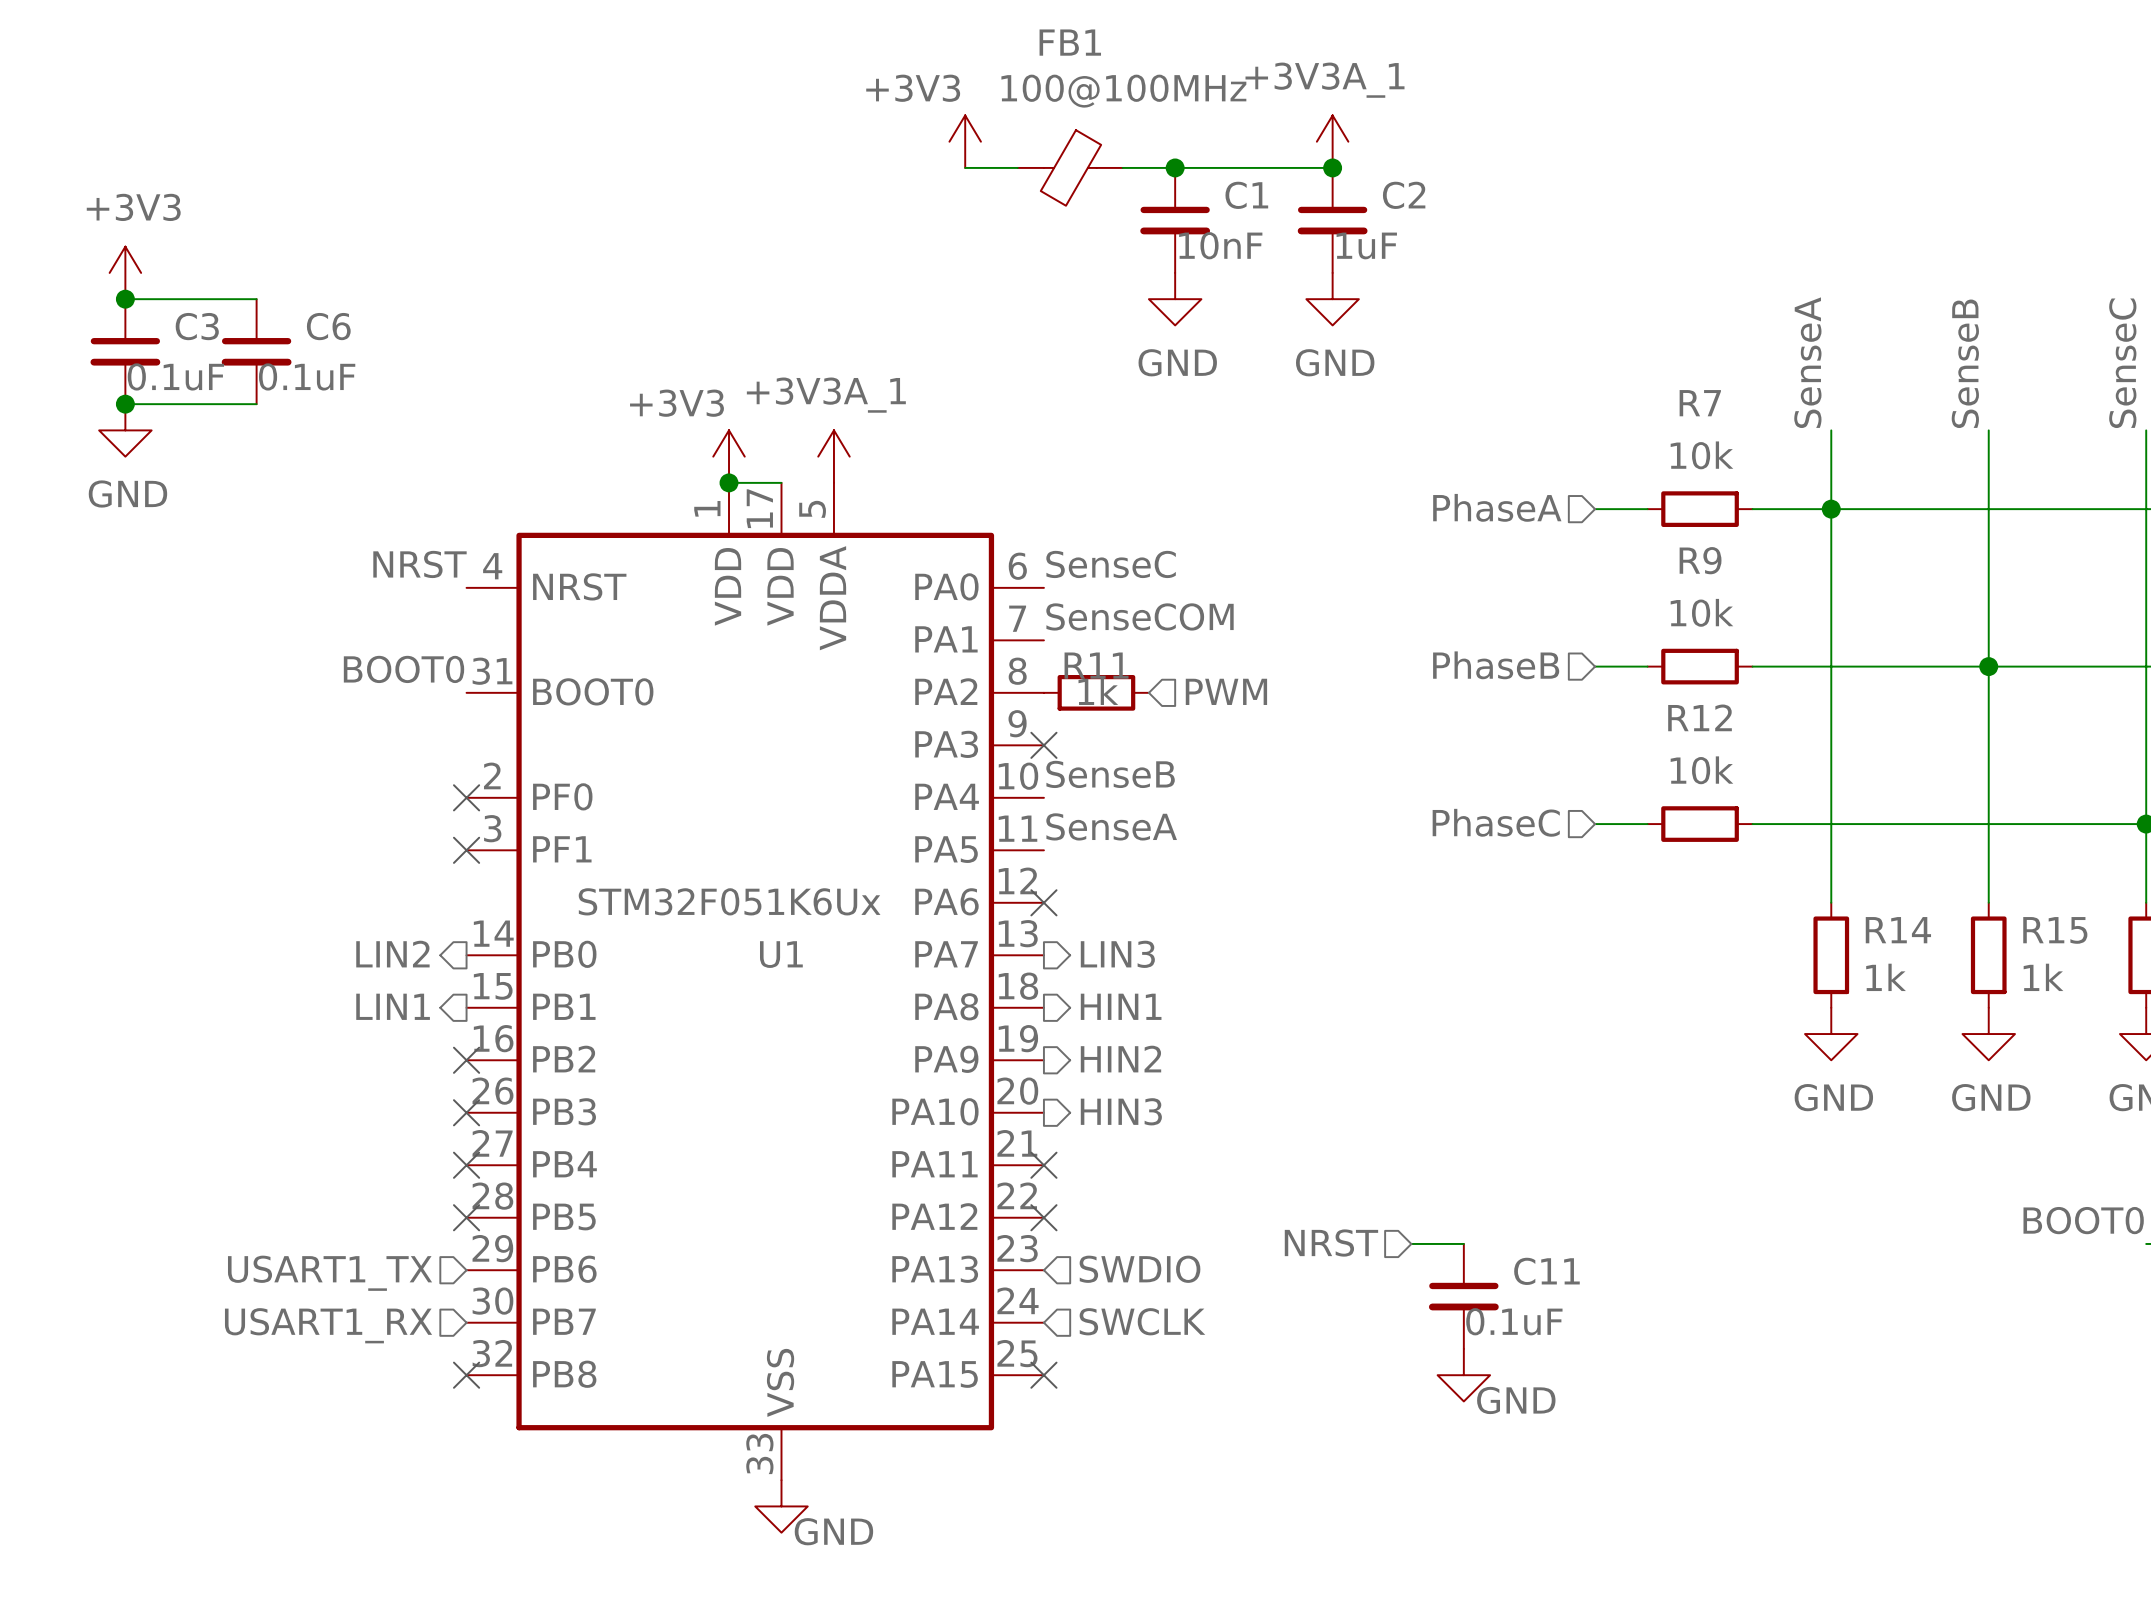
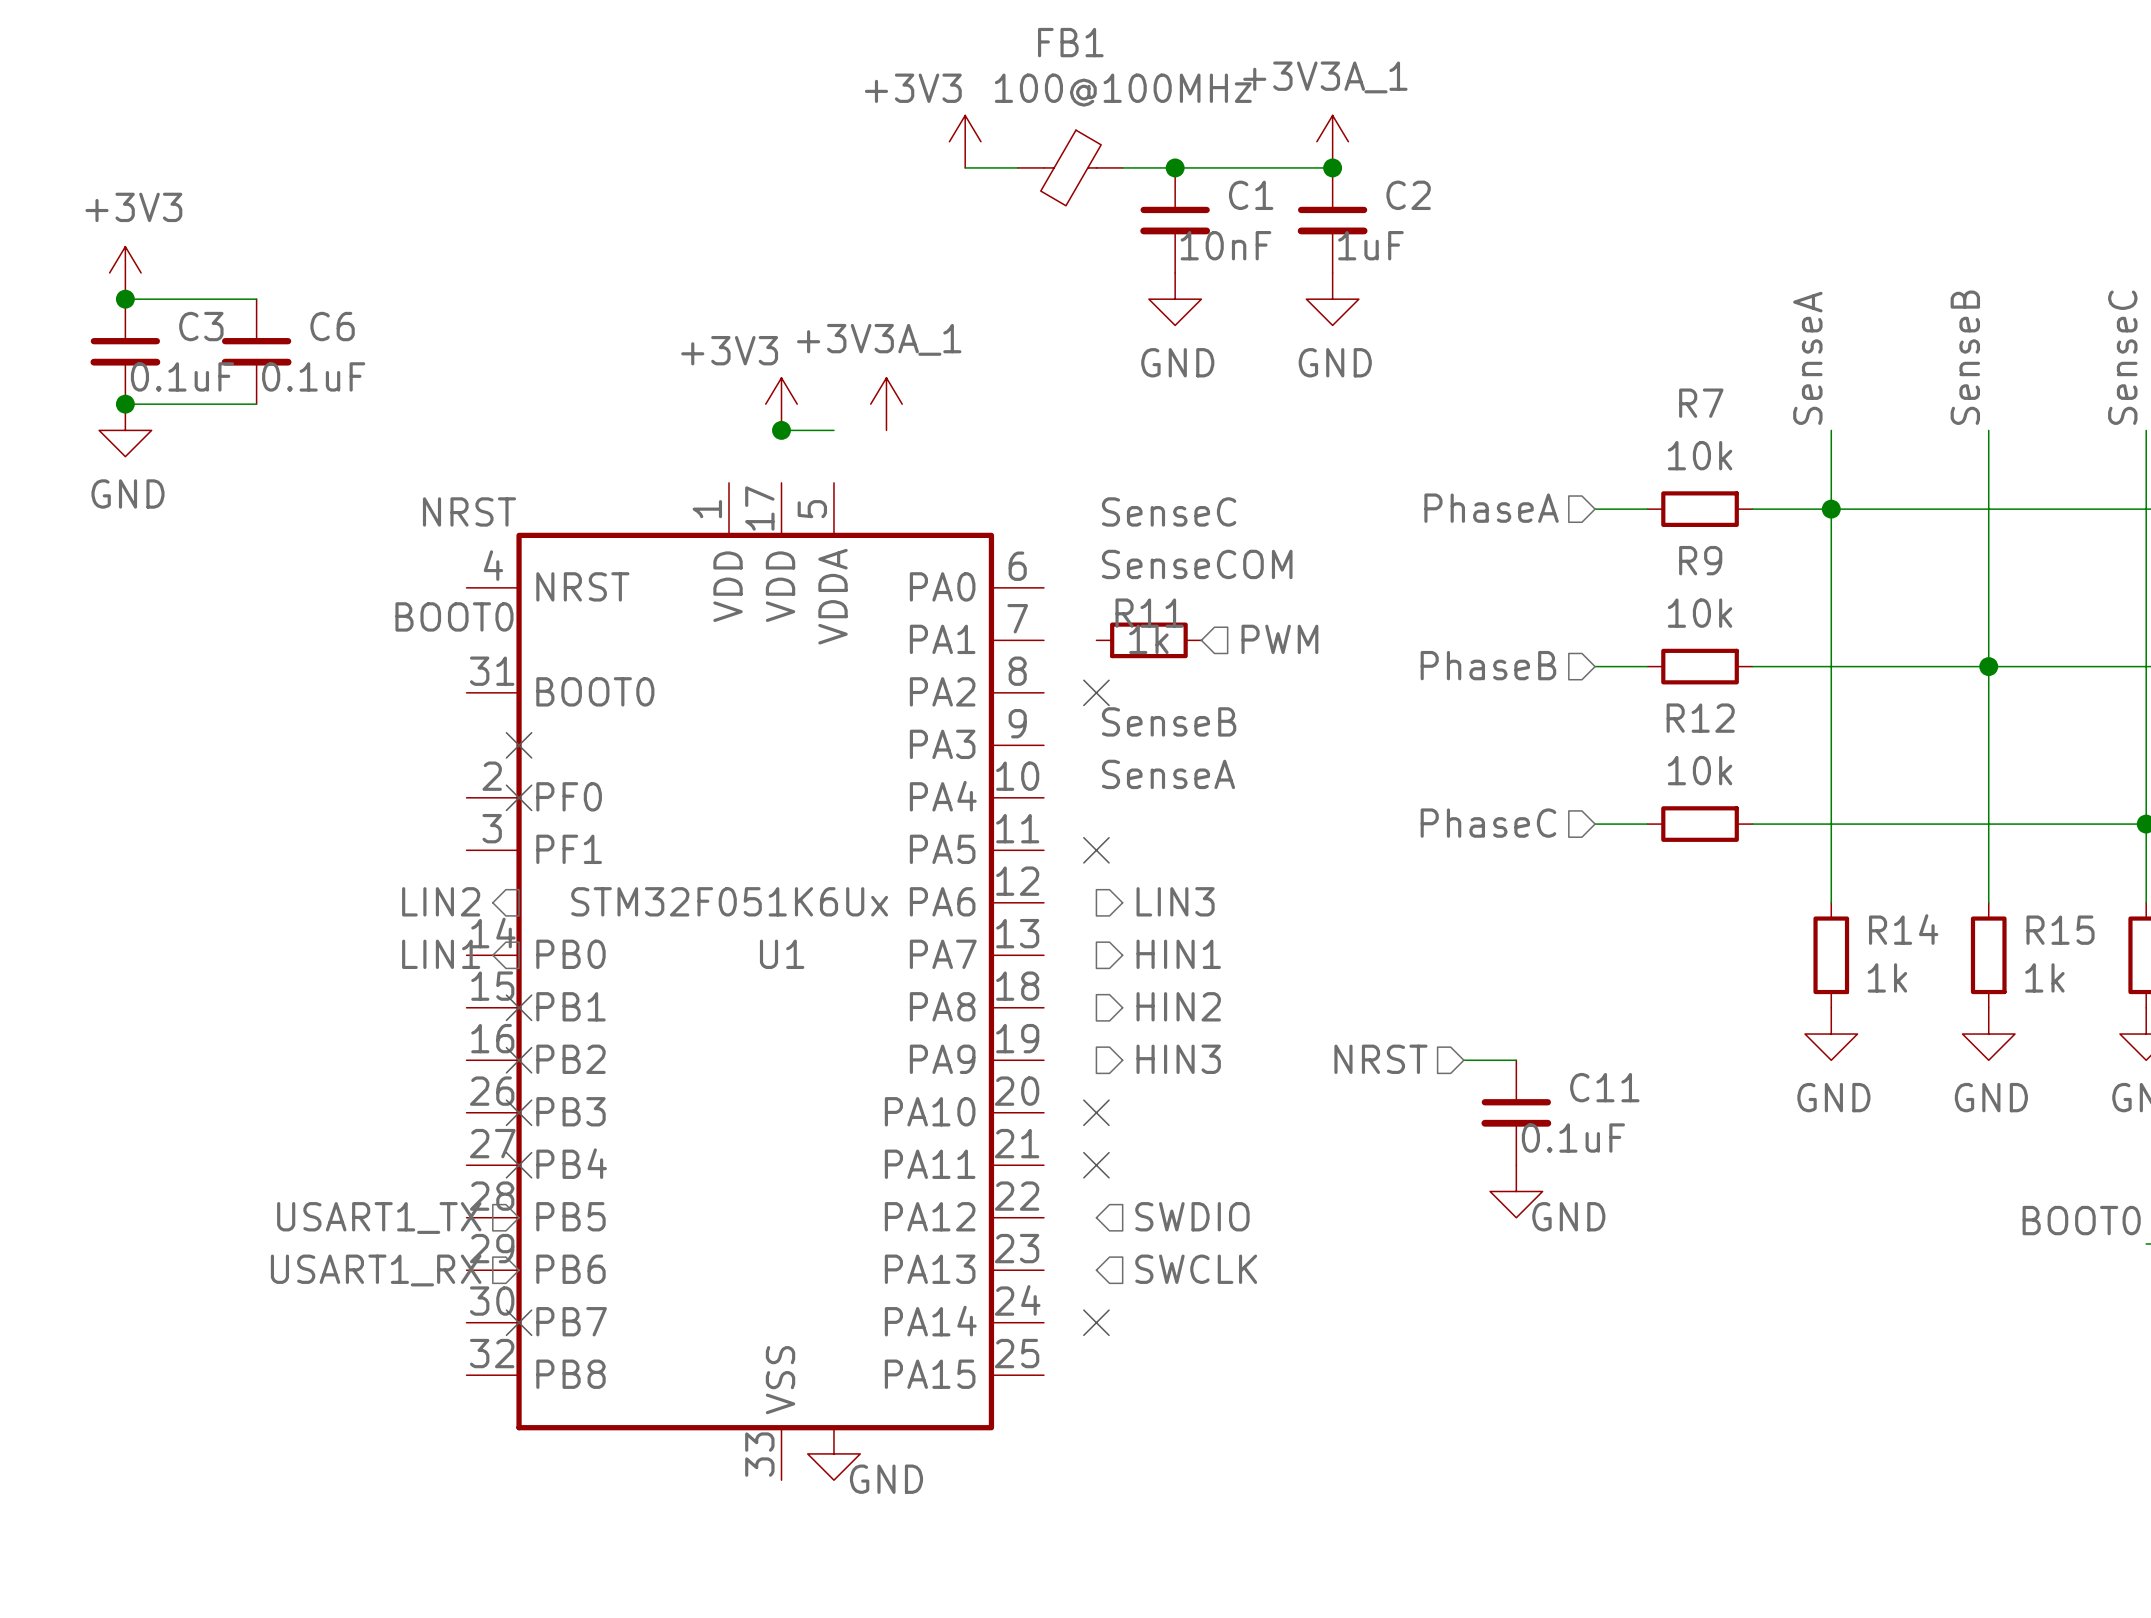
power symbol position: +3V3 (729, 456) -> +3V3 (781, 404)
power symbol position: +3V3A_1 (833, 456) -> +3V3A_1 (886, 404)
wire: (729, 482) (781, 482) -> (781, 430) (833, 430)
junction position: (729, 482) -> (781, 430)
label position: NRST (419, 564) -> NRST (469, 511)
label position: SenseC (1111, 564) -> SenseC (1169, 511)
label position: SenseCOM (1139, 616) -> SenseCOM (1197, 564)
label position: BOOT0 (404, 669) -> BOOT0 (454, 616)
hierarchical label position: PWM (1226, 691) -> PWM (1279, 639)
R11 position: (1096, 692) -> (1148, 640)
no-connect mark: none -> (1096, 692)
no-connect mark: none -> (519, 745)
no-connect mark: (1043, 745) -> none
label position: SenseB (1110, 774) -> SenseB (1169, 721)
no-connect mark: (466, 797) -> none
no-connect mark: none -> (519, 797)
label position: SenseA (1111, 826) -> SenseA (1168, 774)
no-connect mark: (466, 850) -> none
no-connect mark: none -> (1096, 850)
no-connect mark: (1043, 902) -> none
hierarchical label position: LIN2 (392, 954) -> LIN2 (441, 901)
hierarchical label position: LIN3 (1117, 954) -> LIN3 (1175, 901)
hierarchical label position: LIN1 (393, 1006) -> LIN1 (441, 954)
hierarchical label position: HIN1 (1121, 1006) -> HIN1 (1178, 954)
no-connect mark: none -> (519, 1007)
hierarchical label position: HIN2 (1120, 1059) -> HIN2 (1178, 1006)
no-connect mark: (466, 1060) -> none
no-connect mark: none -> (519, 1060)
hierarchical label position: HIN3 (1121, 1111) -> HIN3 (1178, 1059)
no-connect mark: (466, 1112) -> none
no-connect mark: none -> (519, 1112)
no-connect mark: none -> (1096, 1112)
no-connect mark: (466, 1165) -> none
no-connect mark: none -> (519, 1165)
no-connect mark: (1043, 1165) -> none
no-connect mark: none -> (1096, 1165)
no-connect mark: (466, 1217) -> none
no-connect mark: (1043, 1217) -> none
hierarchical label position: NRST (1331, 1243) -> NRST (1380, 1059)
wire: (1411, 1243) (1463, 1243) -> (1463, 1060) (1516, 1060)
hierarchical label position: SWDIO (1140, 1269) -> SWDIO (1192, 1216)
hierarchical label position: USART1_TX (330, 1273) -> USART1_TX (379, 1218)
C11 position: (1463, 1296) -> (1516, 1112)
hierarchical label position: SWCLK (1142, 1321) -> SWCLK (1196, 1269)
no-connect mark: none -> (519, 1322)
no-connect mark: none -> (1096, 1322)
hierarchical label position: USART1_RX (328, 1325) -> USART1_RX (376, 1270)
no-connect mark: (466, 1375) -> none
no-connect mark: (1043, 1375) -> none
power symbol position: GND (1463, 1375) -> GND (1516, 1191)
power symbol position: GND (781, 1506) -> GND (833, 1453)

